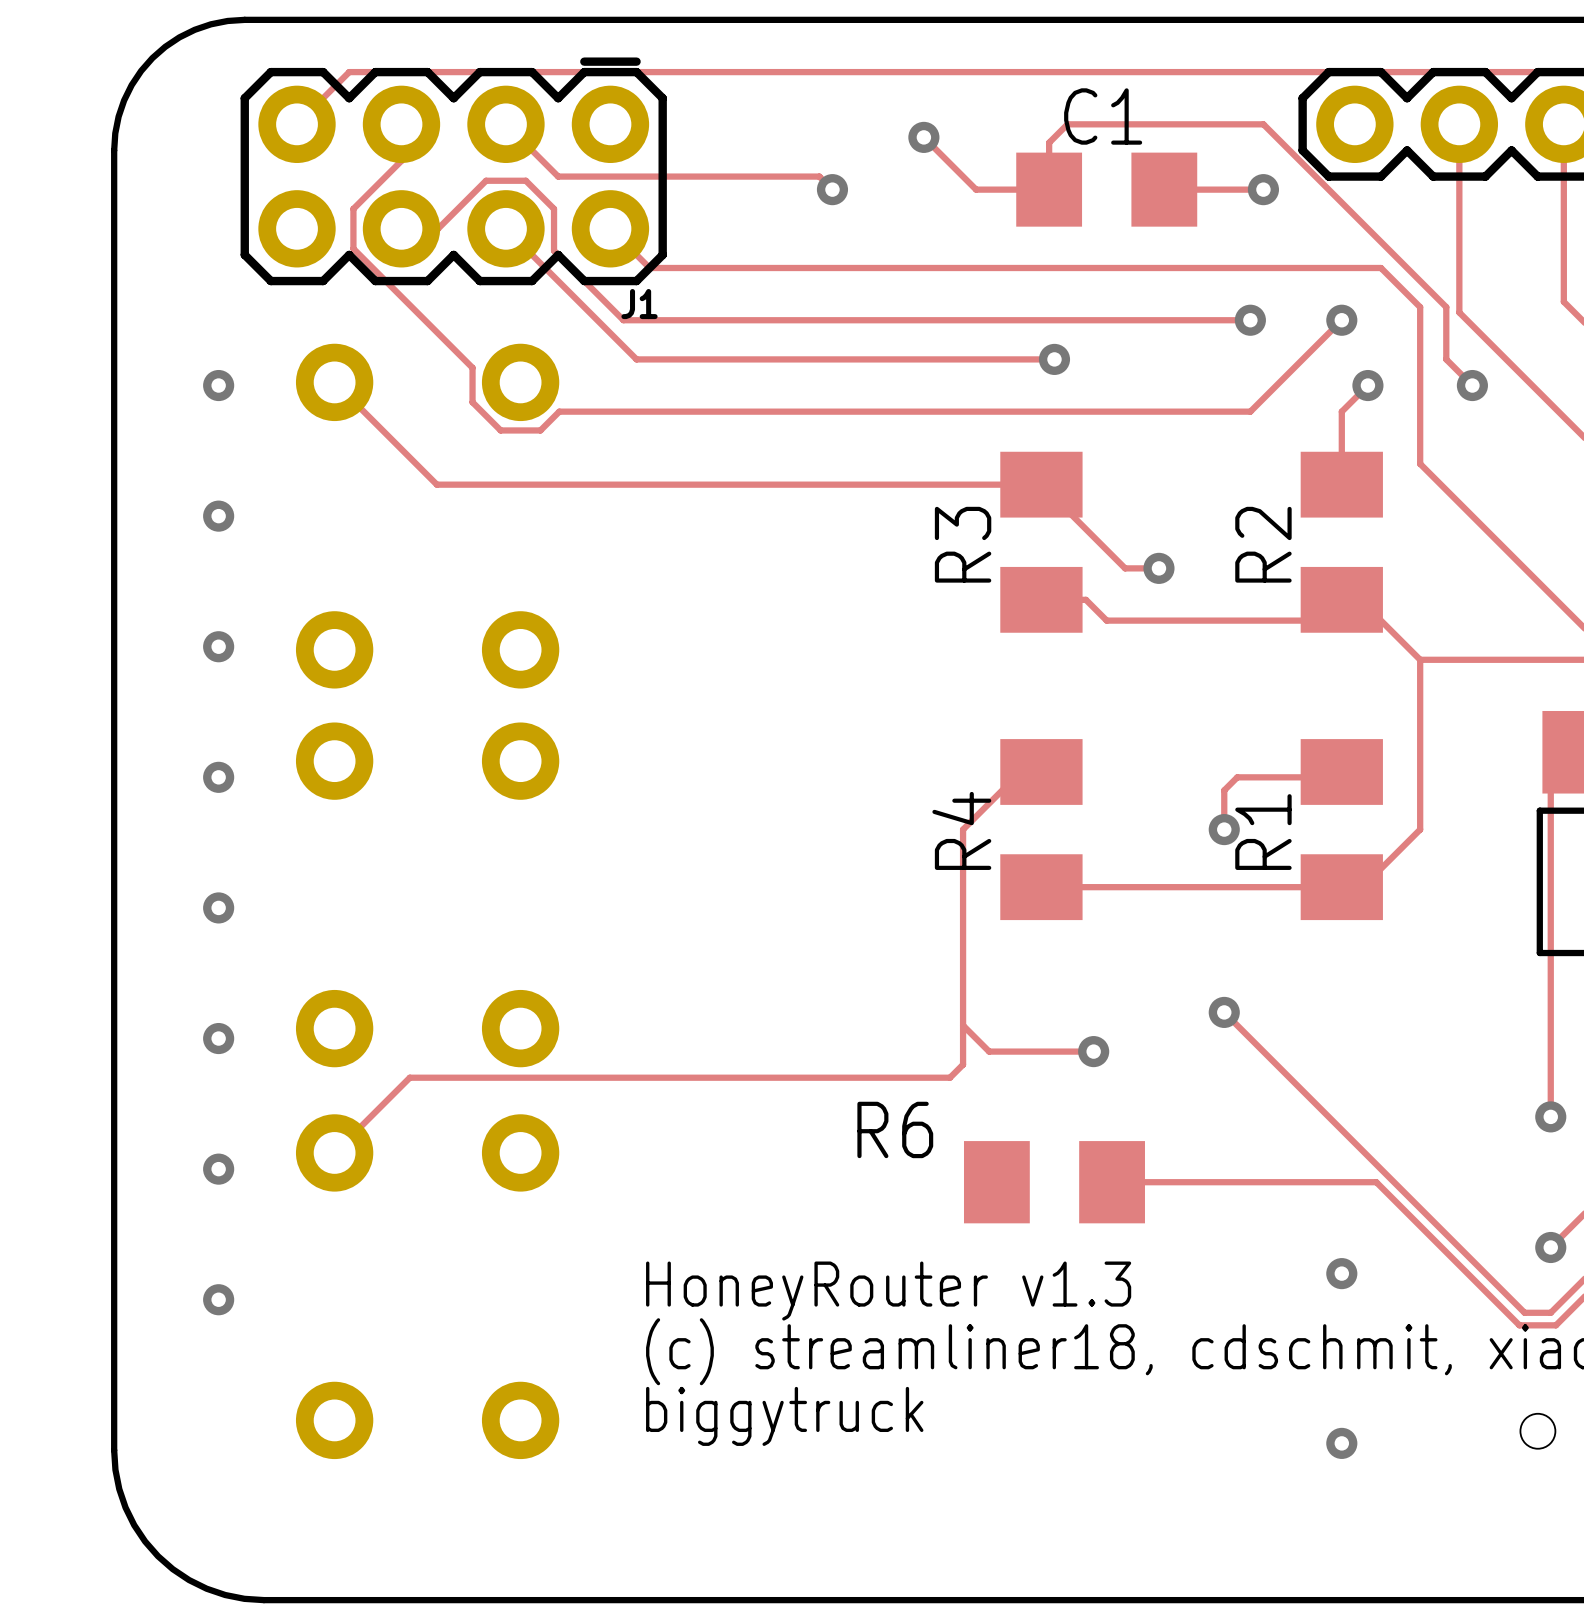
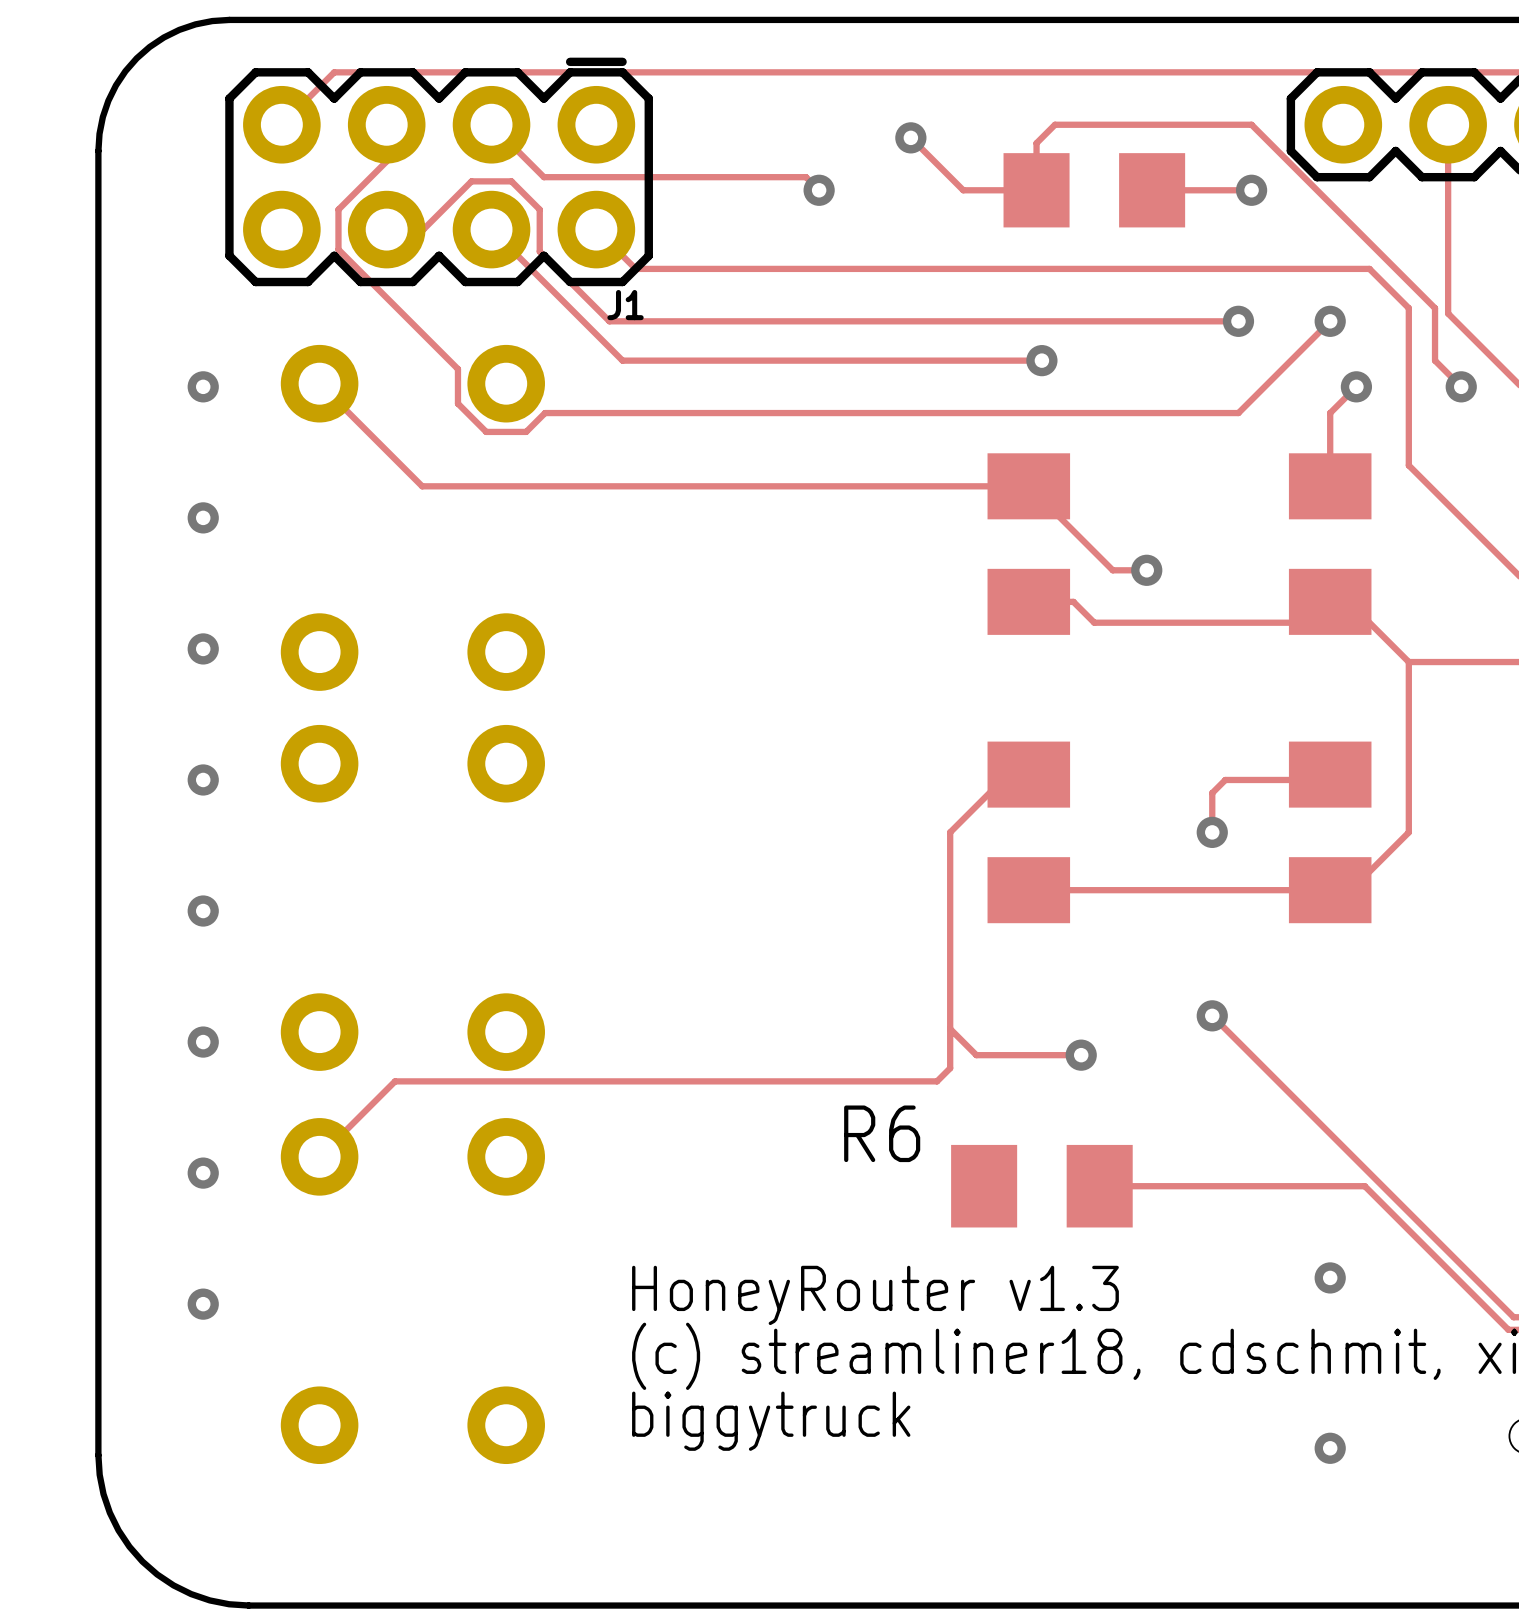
C1 name: C1 (1103, 116) -> none
R3 name: R3 (963, 544) -> none
R2 name: R2 (1263, 544) -> none
R4 name: R4 (961, 830) -> none
R1 name: R1 (1263, 832) -> none

